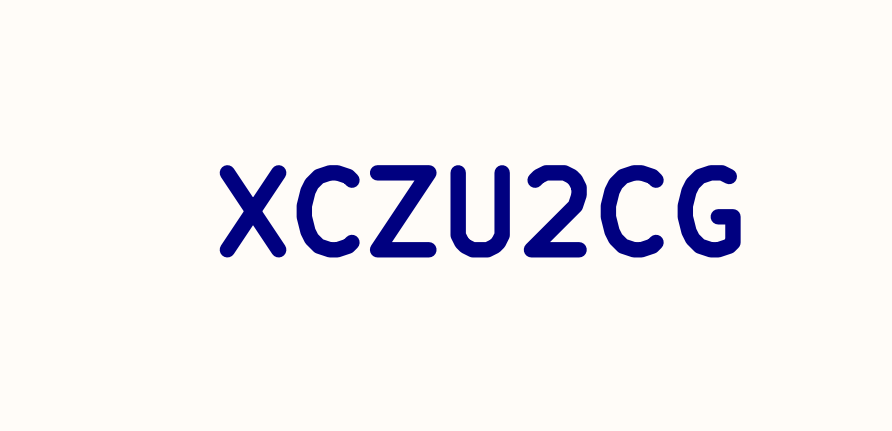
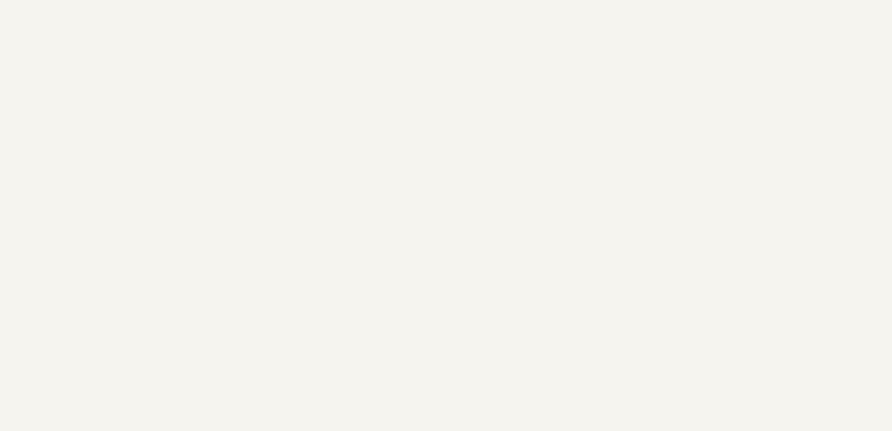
text: XCZU2CG (480, 211) -> none

